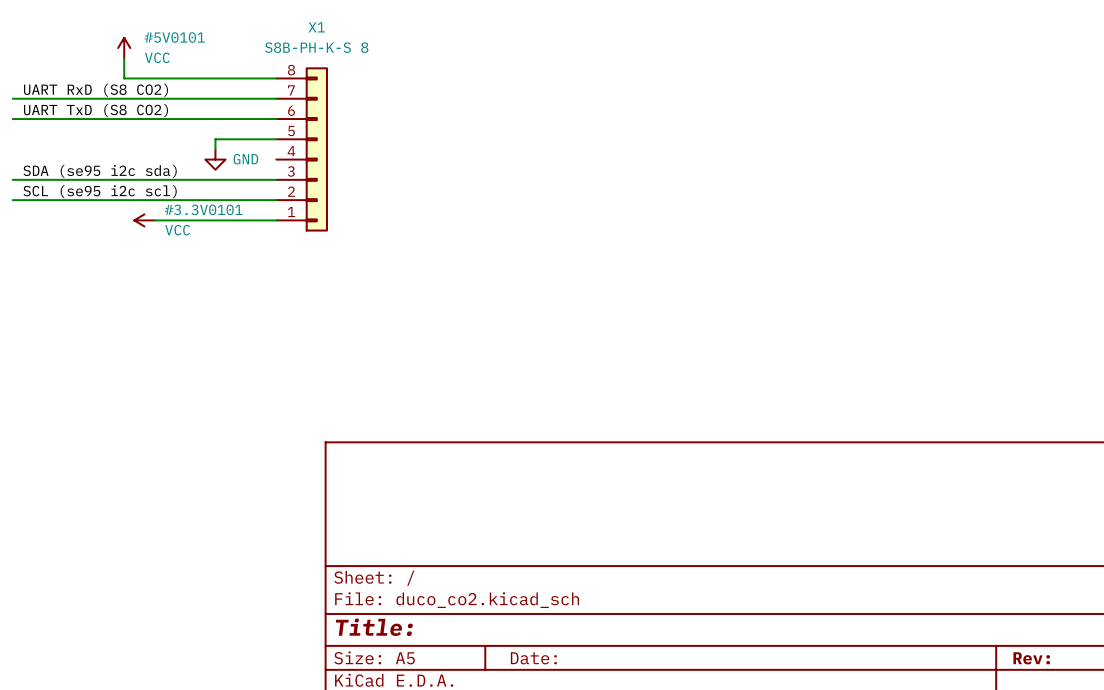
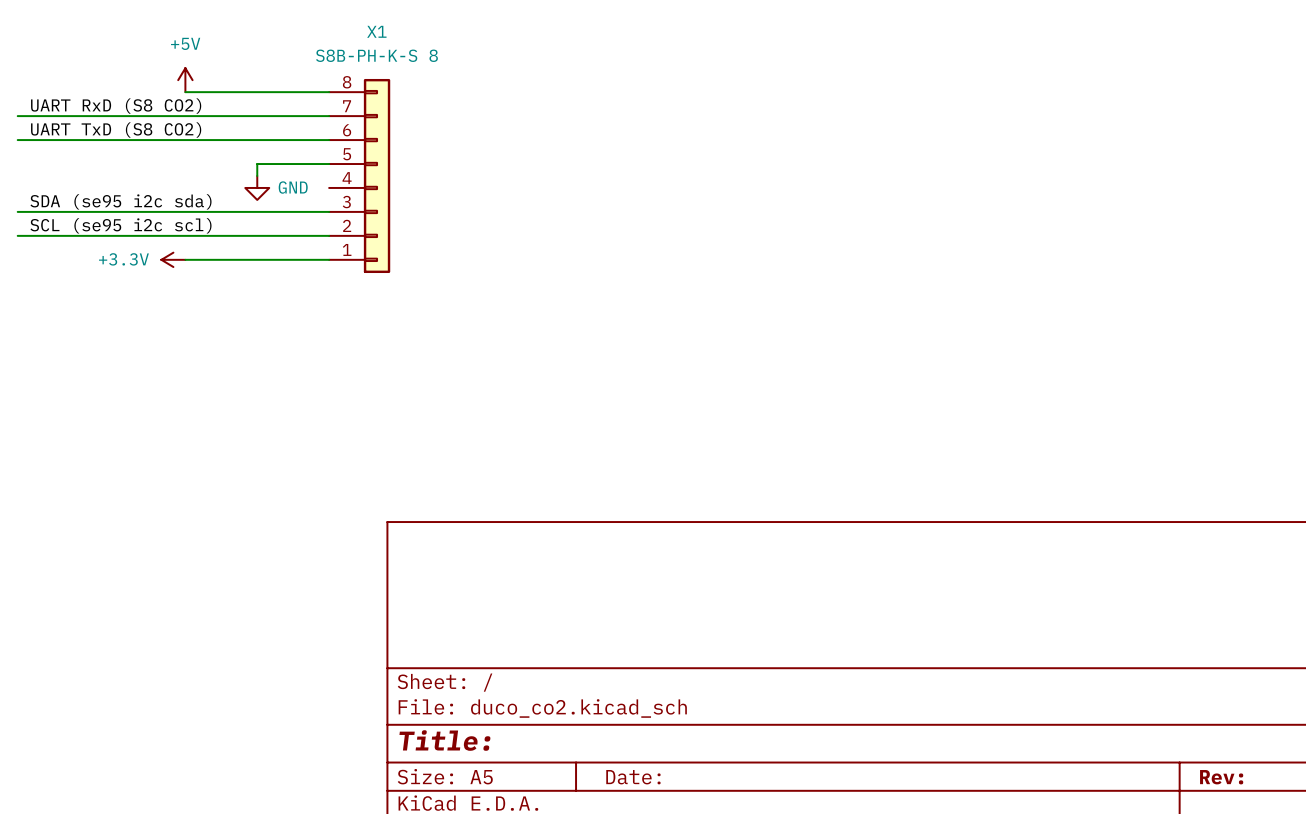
#5V0101: VCC (124, 48) -> none
wire: (124, 58) (124, 78) (154, 78) -> none
power symbol: none -> +5V (185, 80)
power symbol: VCC (144, 220) -> +3.3V (173, 259)

